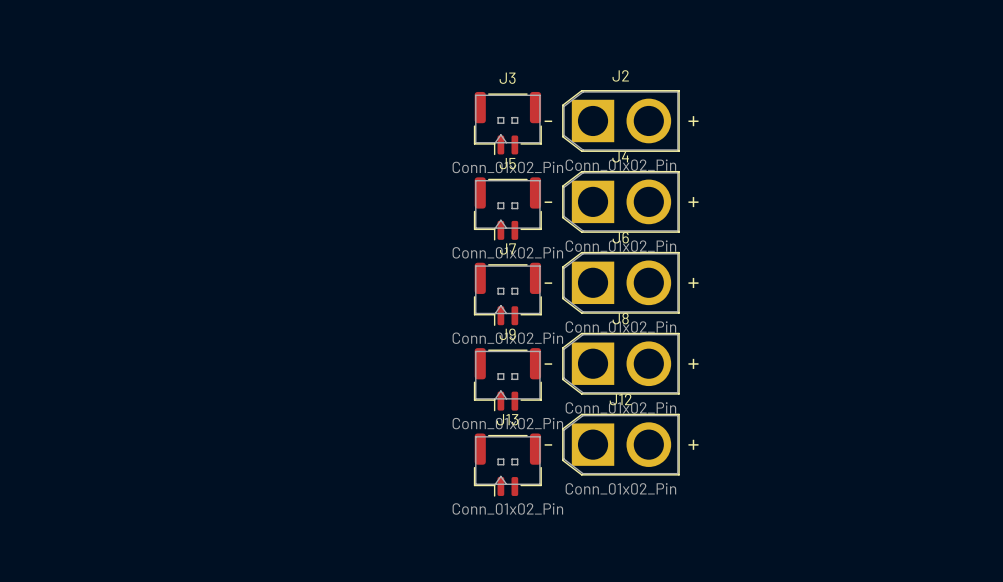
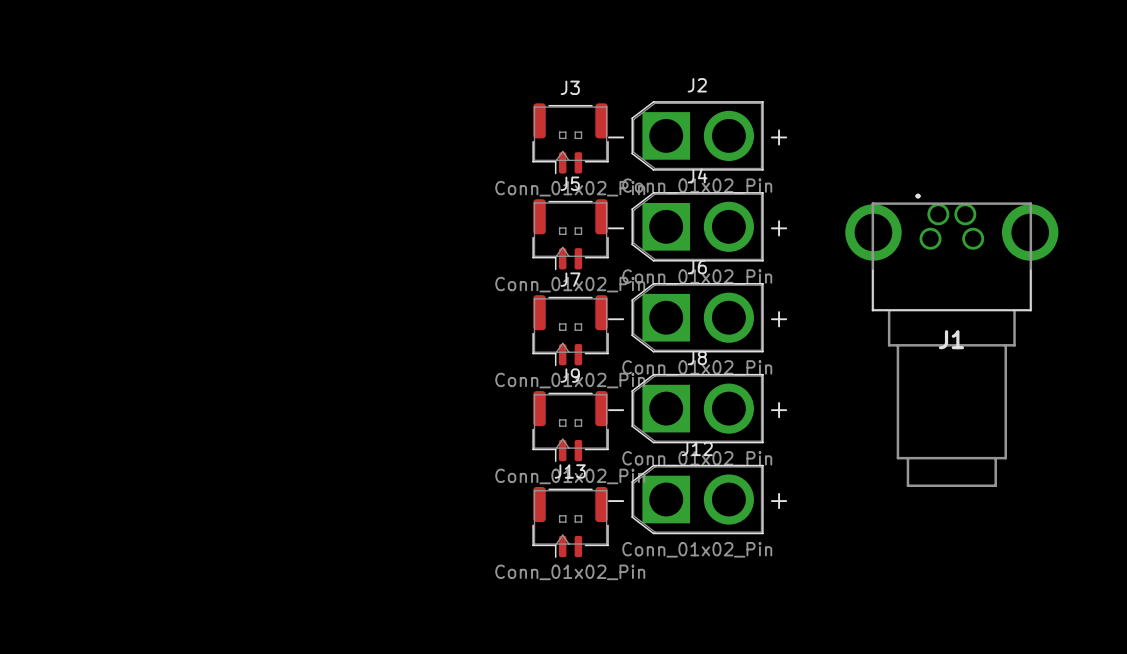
J1: none -> (951, 340)

